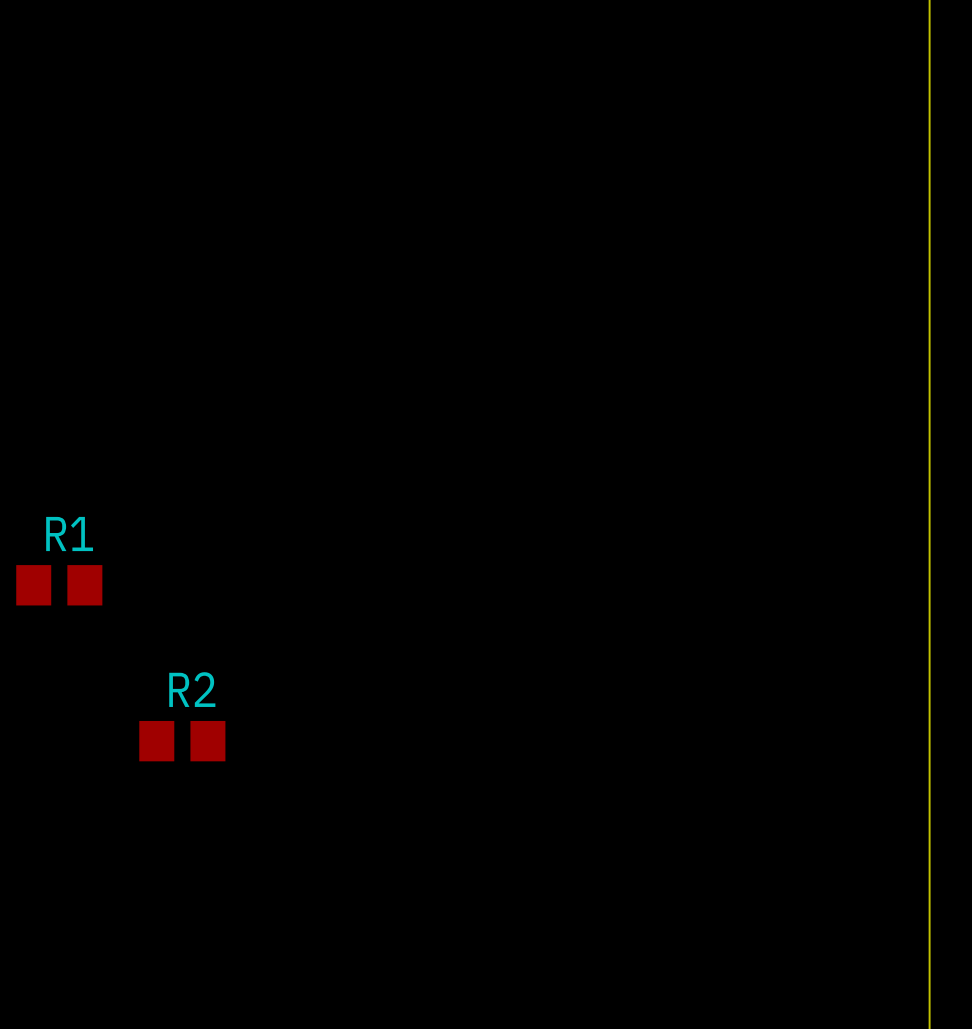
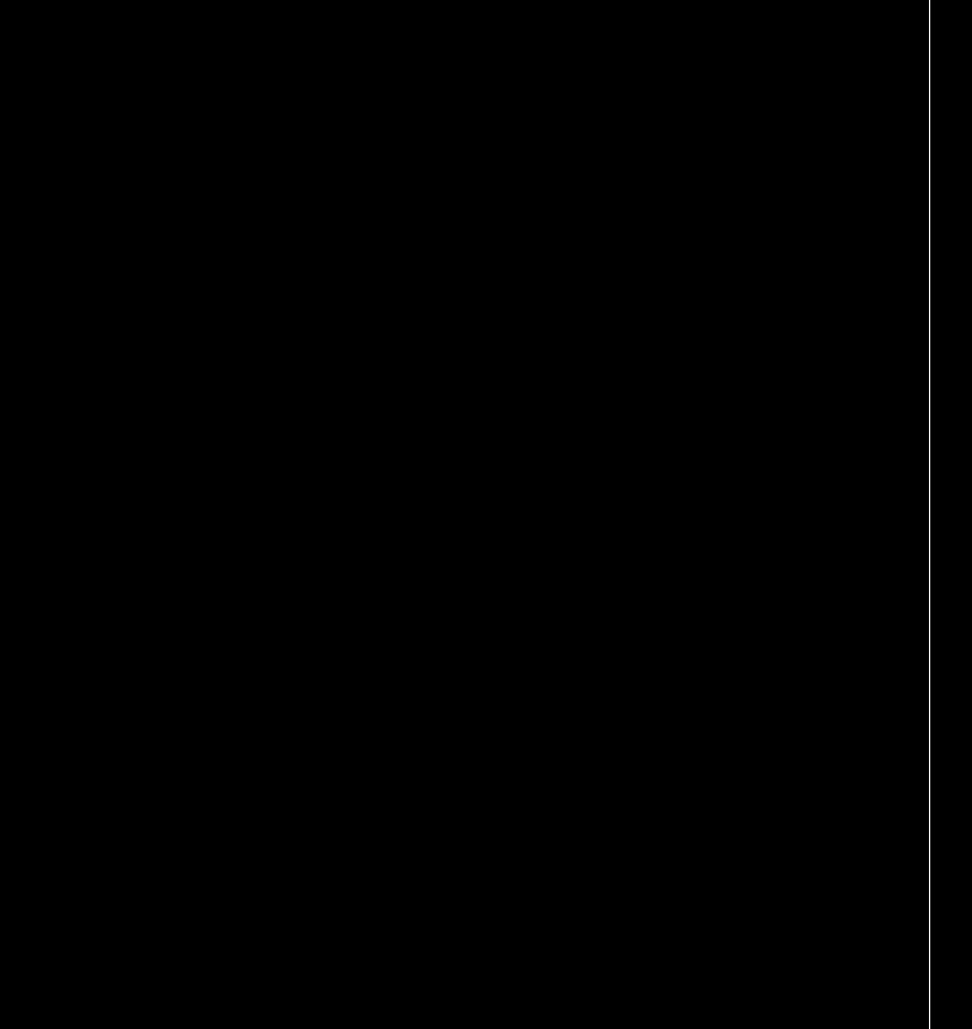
R1: (59, 585) -> none
R2: (182, 741) -> none

